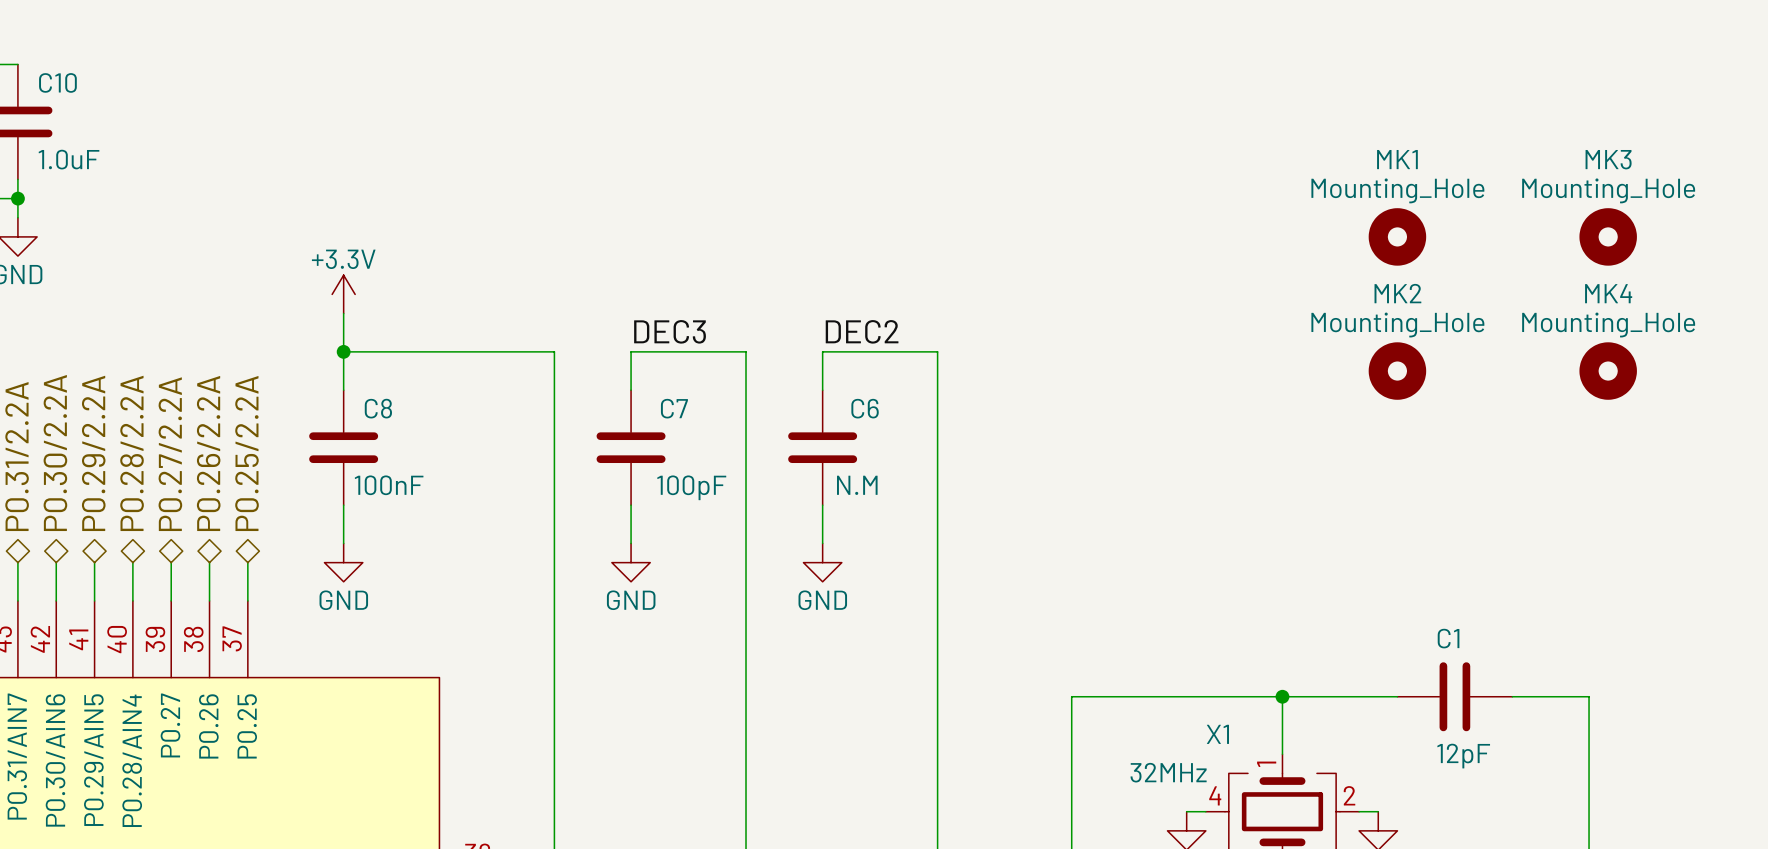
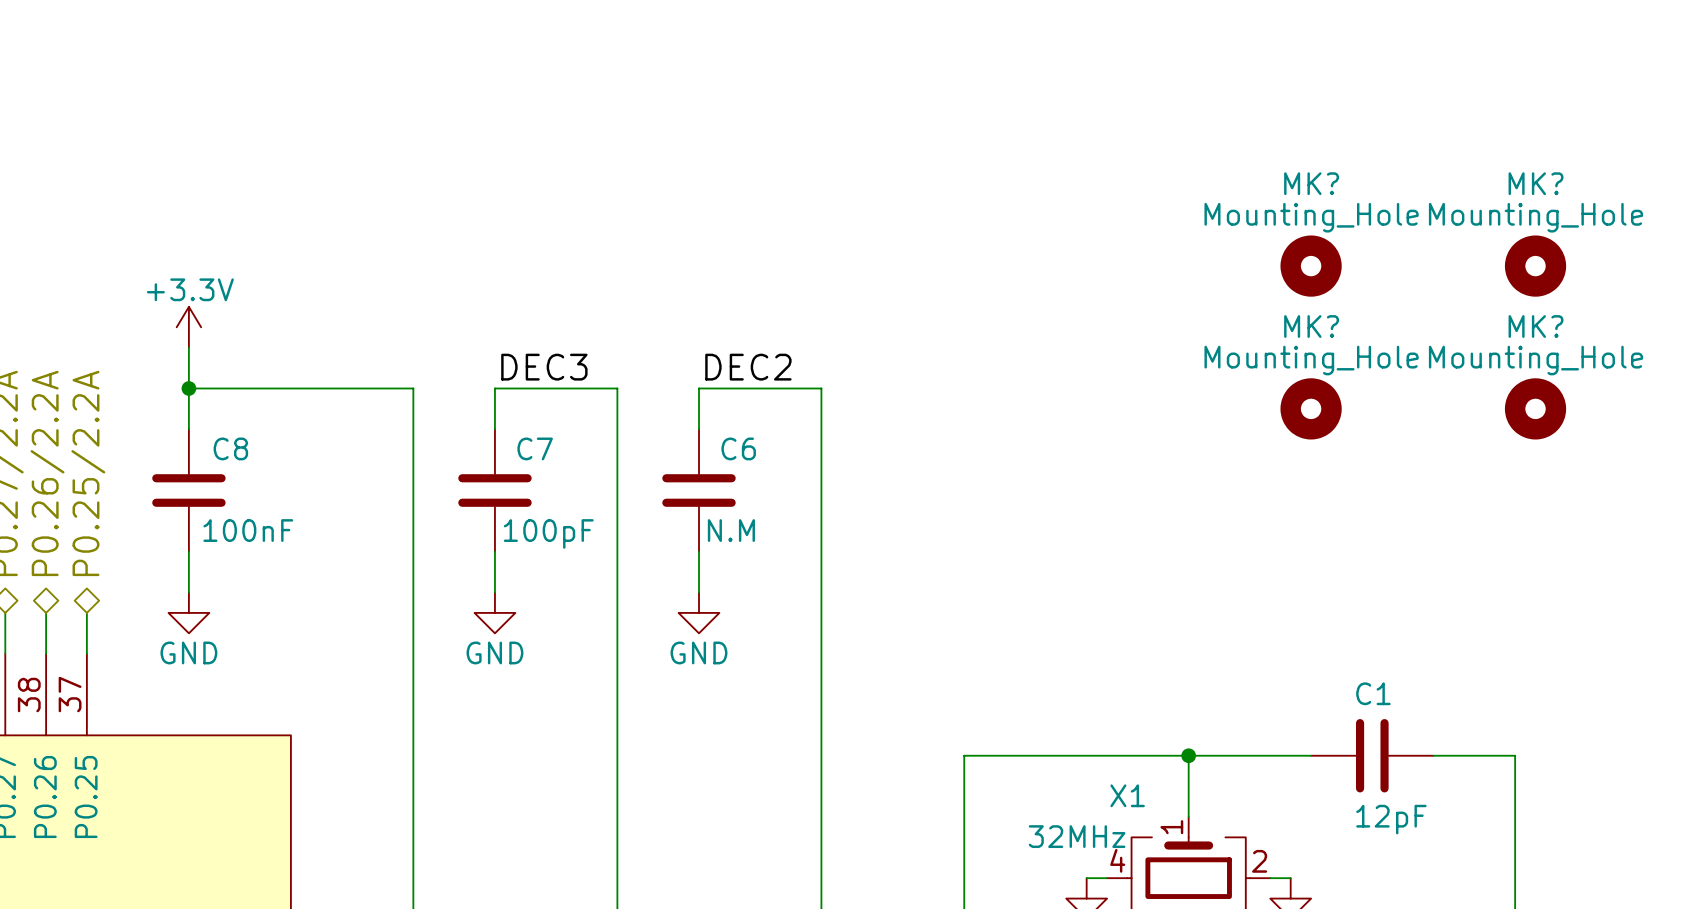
MK1 name: MK1 (1397, 159) -> MK? (1311, 183)
MK3 name: MK3 (1608, 159) -> MK? (1536, 183)
MK2 name: MK2 (1397, 293) -> MK? (1311, 326)
MK4 name: MK4 (1608, 293) -> MK? (1536, 326)

